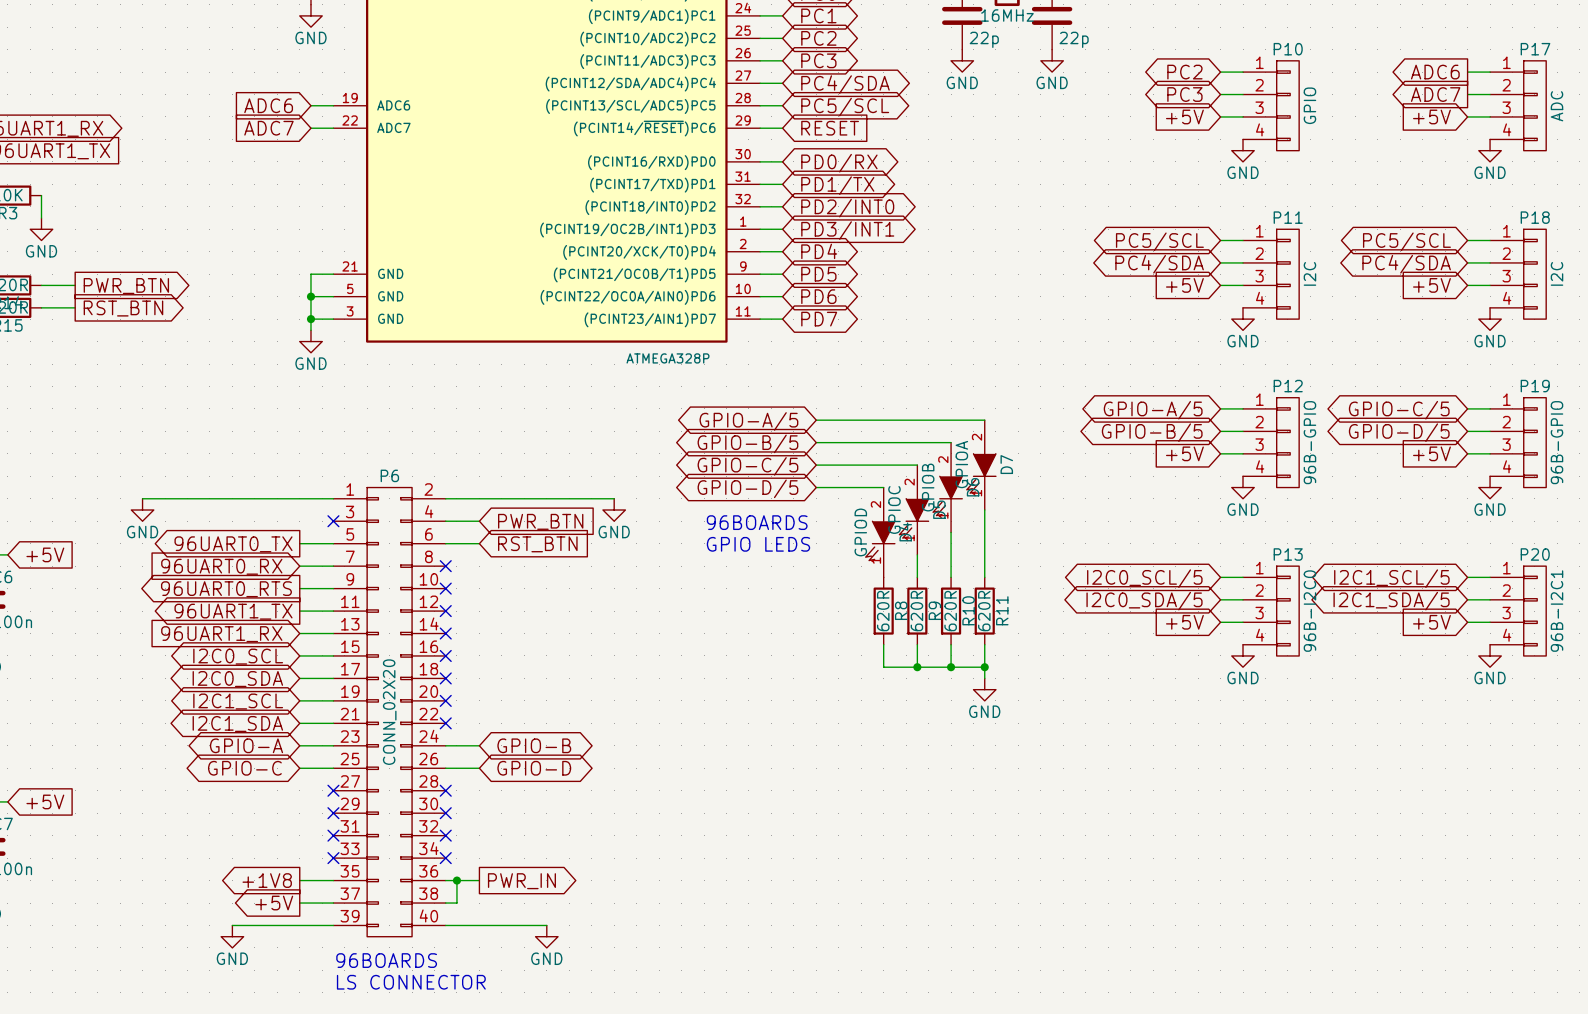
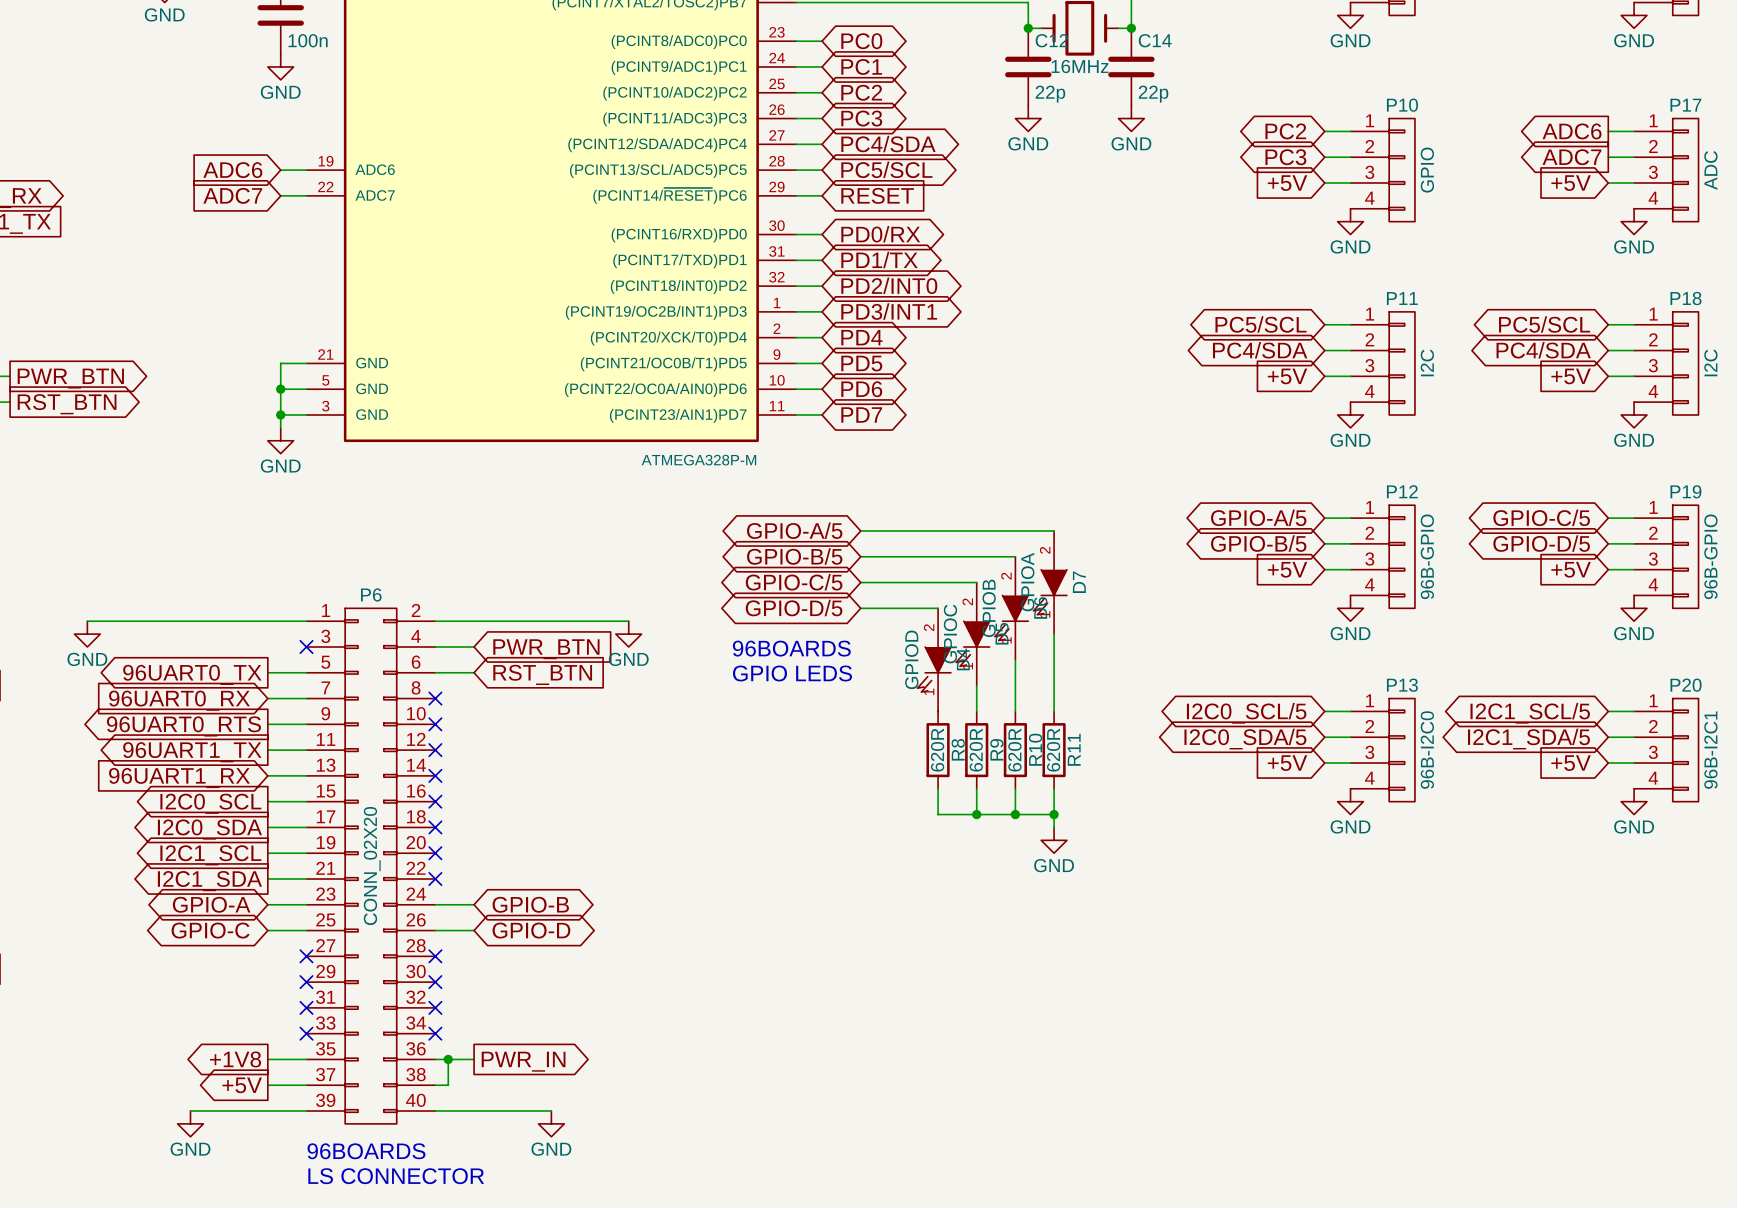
part value: ATMEGA328P (668, 358) -> ATMEGA328P-M (698, 460)
global label shape: bidirectional (238, 656) -> output (210, 803)
global label shape: bidirectional (237, 679) -> output (209, 829)
global label shape: bidirectional (238, 701) -> output (210, 855)
global label shape: bidirectional (237, 723) -> output (209, 881)

